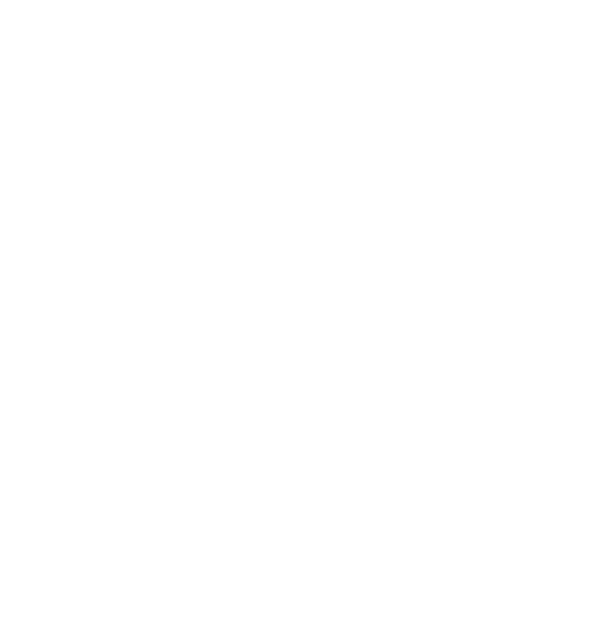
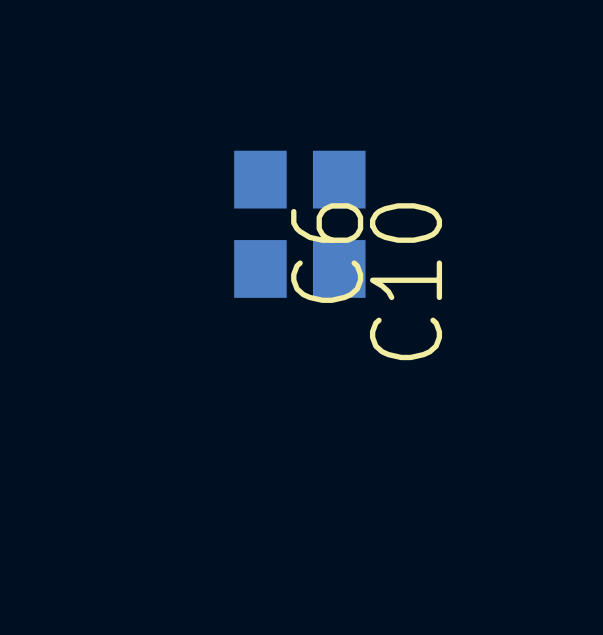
C6: none -> (260, 224)
C10: none -> (339, 224)

